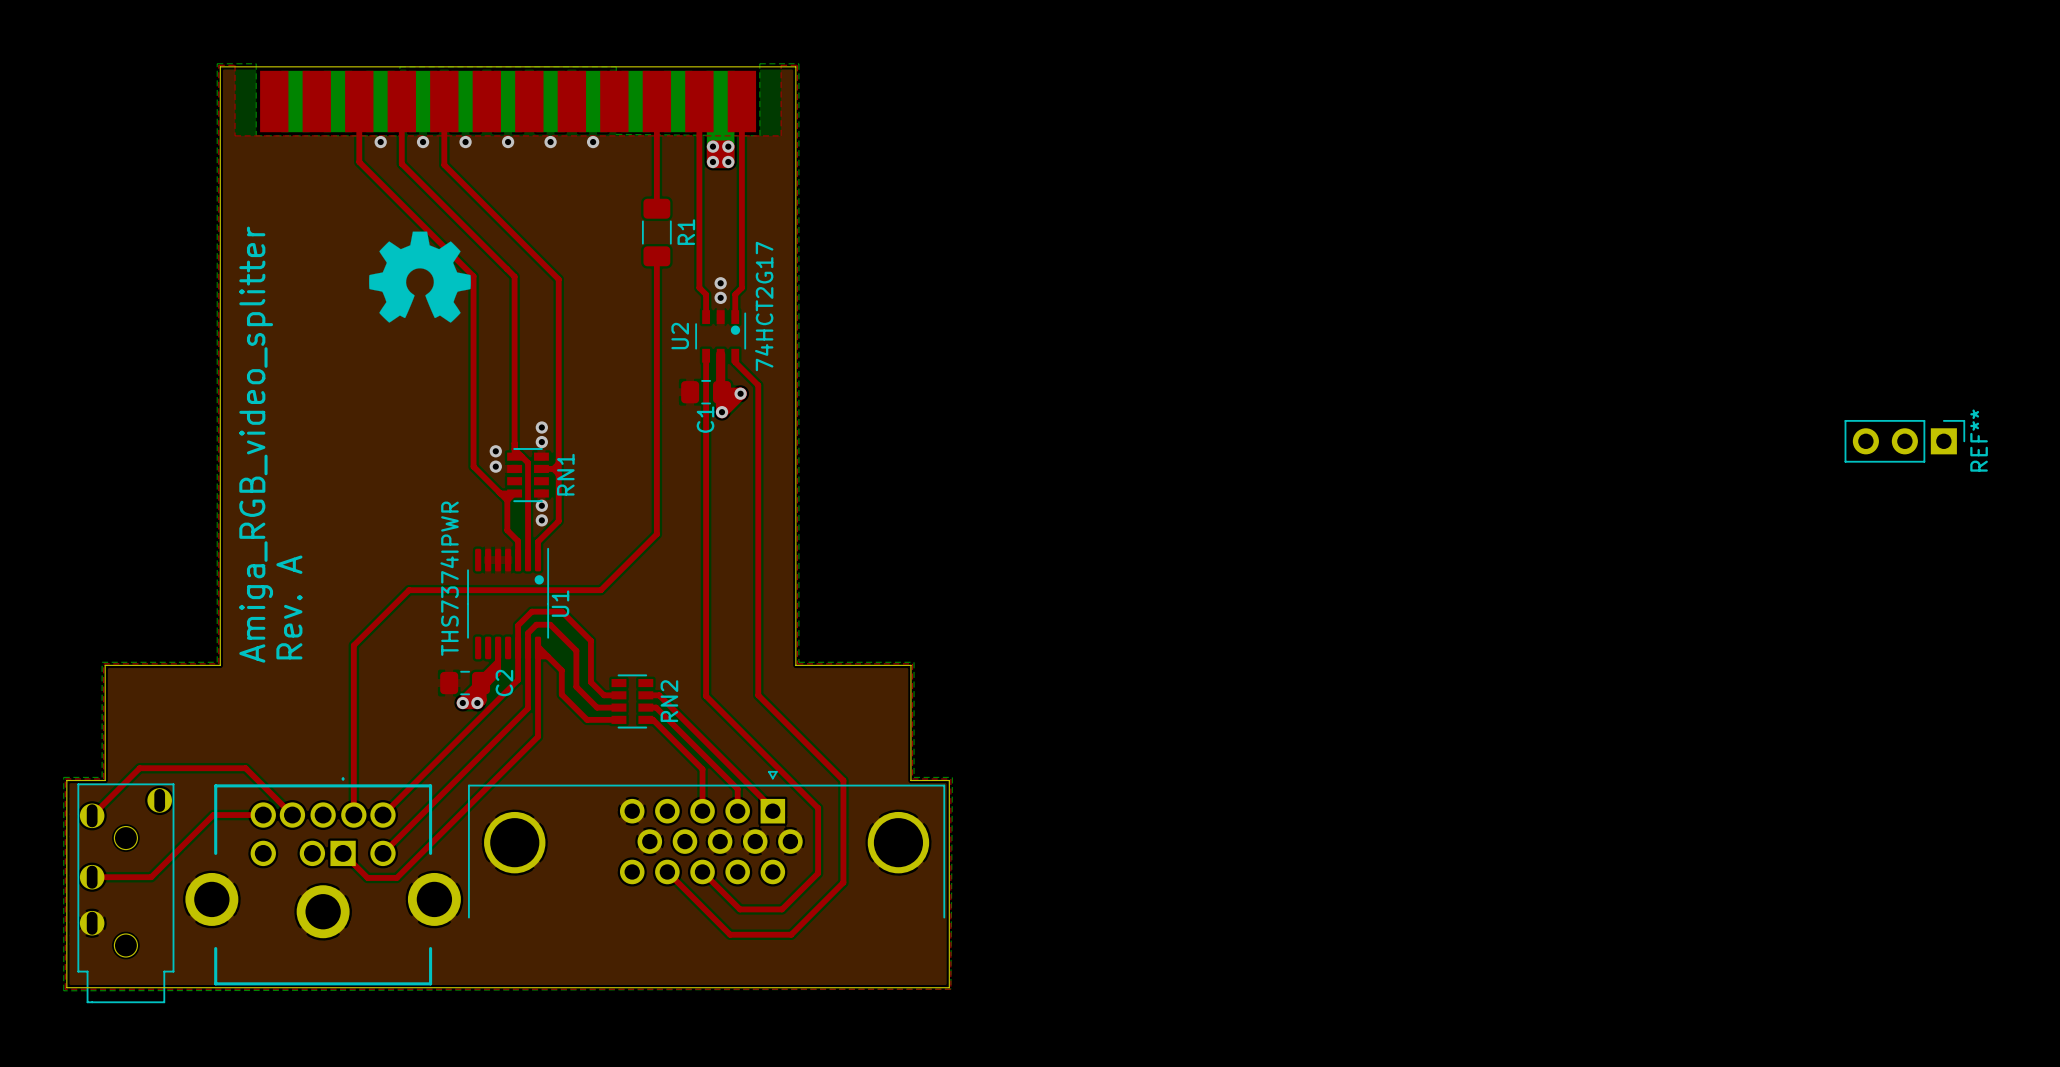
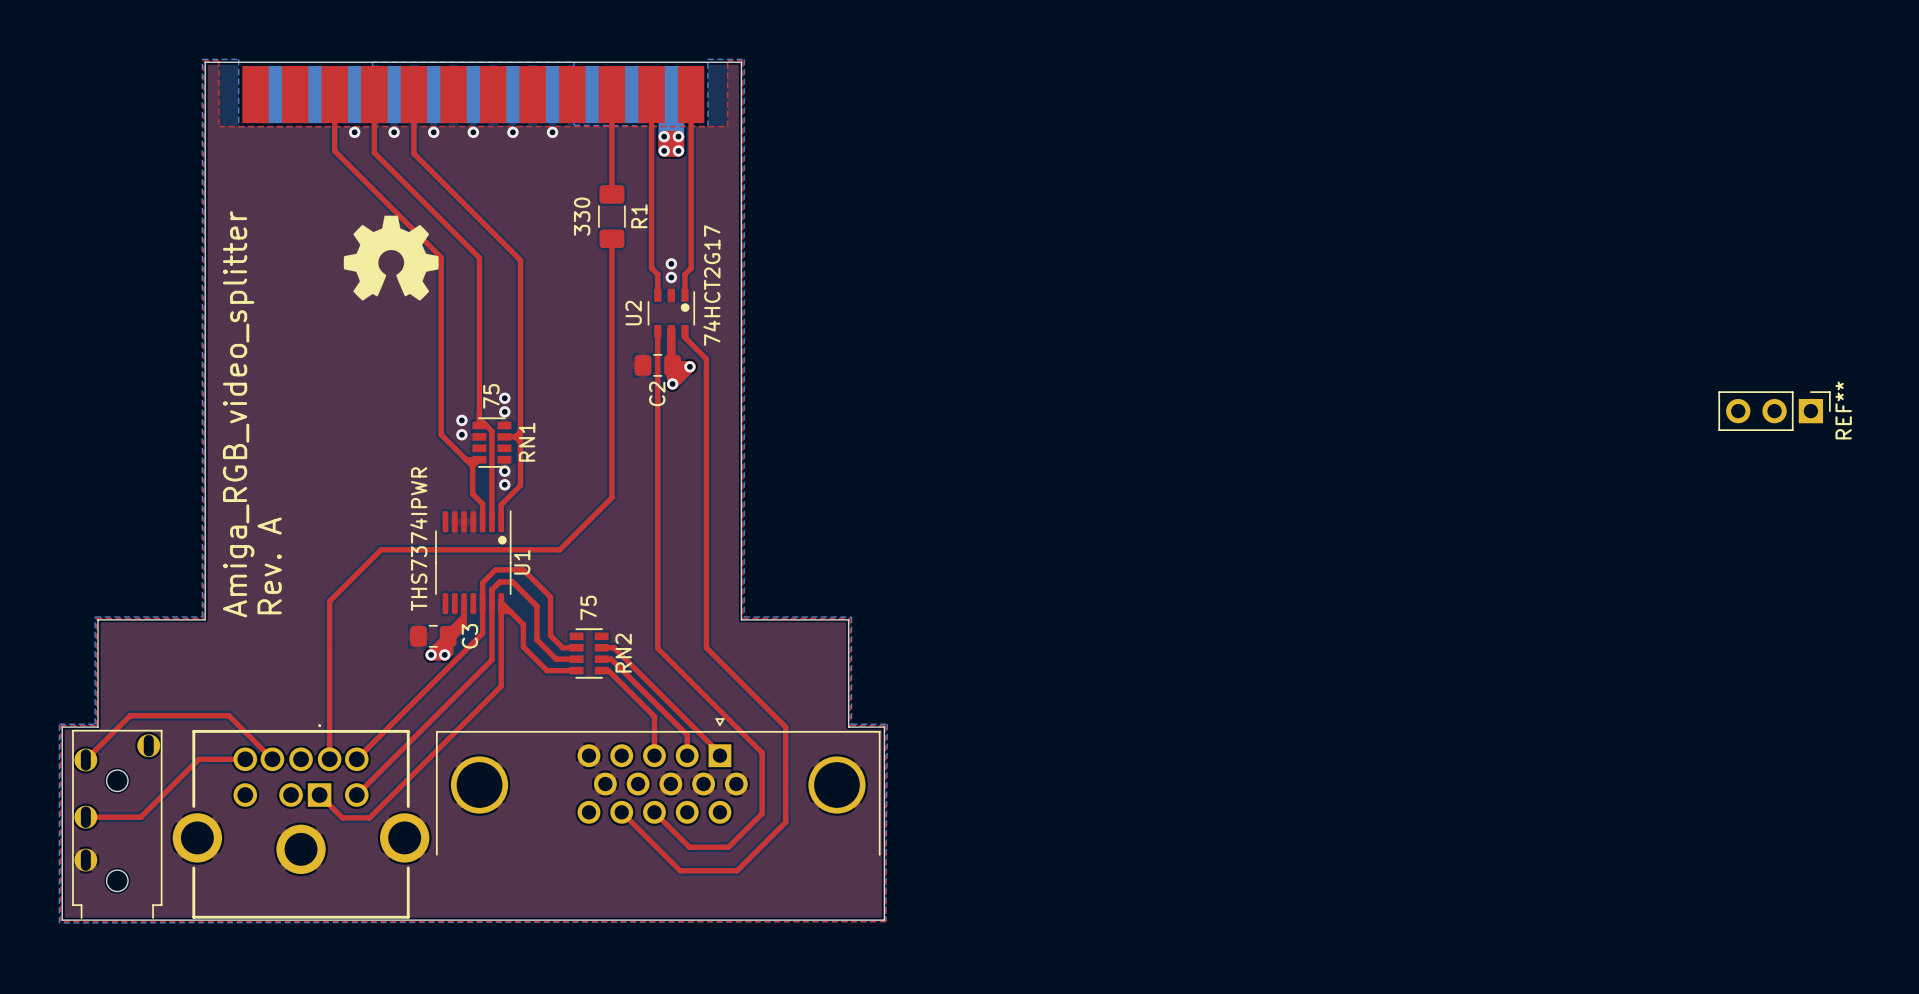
text: none -> 330 (582, 216)
C1 name: C1 (705, 419) -> C2 (657, 393)
text: none -> 75 (491, 396)
text: none -> 75 (588, 608)
C2 name: C2 (504, 683) -> C3 (469, 636)
part footprint: [185, 777, 461, 986] -> [172, 724, 430, 919]
part footprint: [77, 783, 175, 1004] -> [72, 729, 163, 919]

